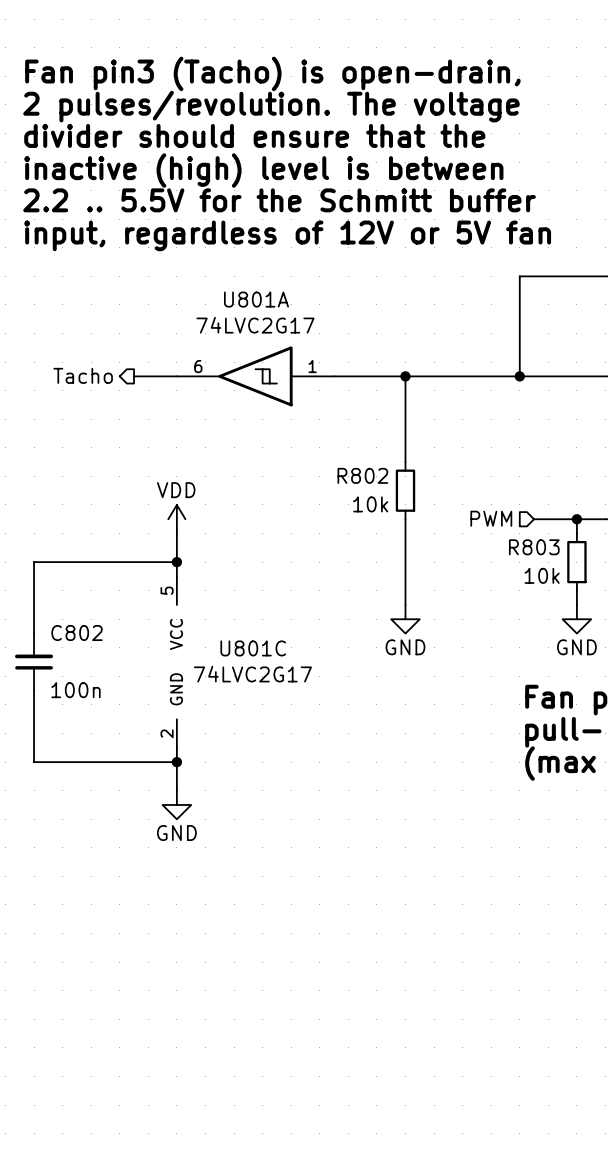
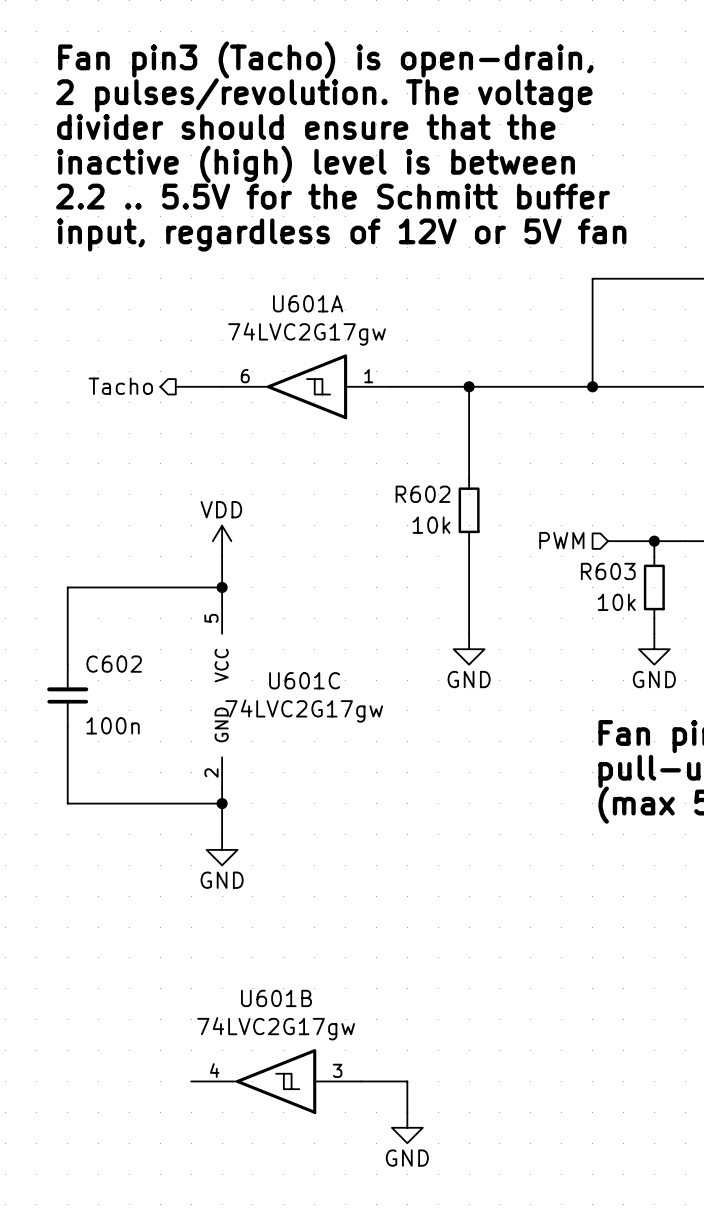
U801A name: U801A (256, 299) -> U601A (308, 303)
U801A value: 74LVC2G17 (255, 325) -> 74LVC2G17gw (307, 334)
R802 name: R802 (362, 475) -> R602 (423, 494)
R803 name: R803 (534, 547) -> R603 (608, 571)
C802 name: C802 (77, 633) -> C602 (114, 664)
U801C name: U801C (253, 648) -> U601C (304, 680)
U801C value: 74LVC2G17 (252, 674) -> 74LVC2G17gw (304, 711)
U601B: none -> 74LVC2G17gw (276, 1081)
wire: none -> (361, 1081) (407, 1081) (407, 1112)
power symbol: none -> GND (407, 1127)

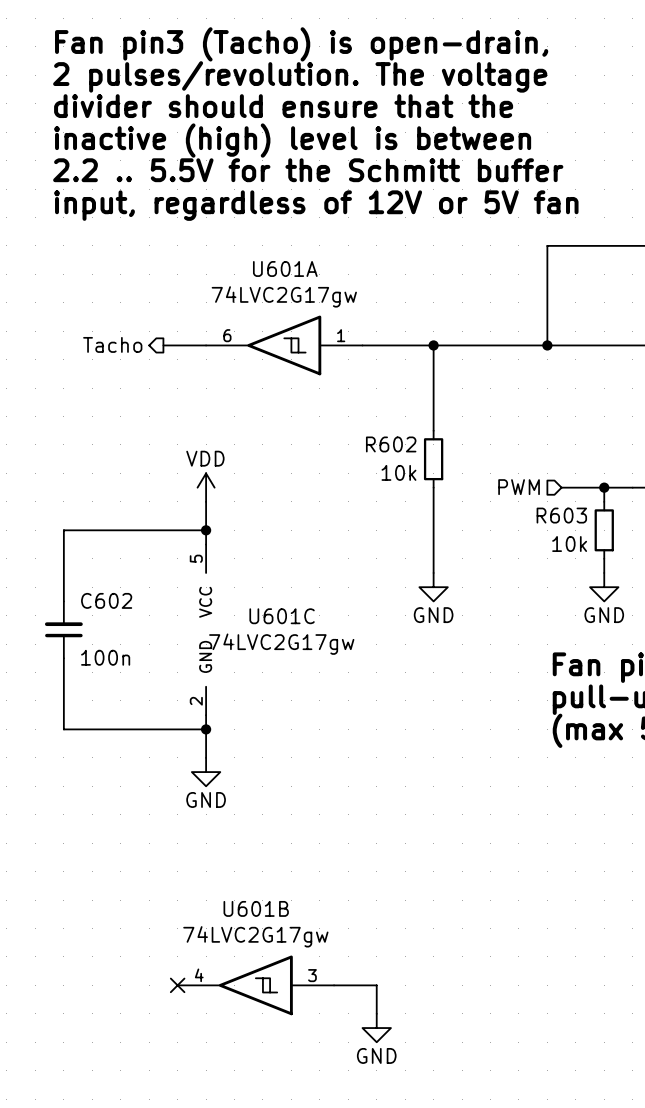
no-connect mark: none -> (177, 985)

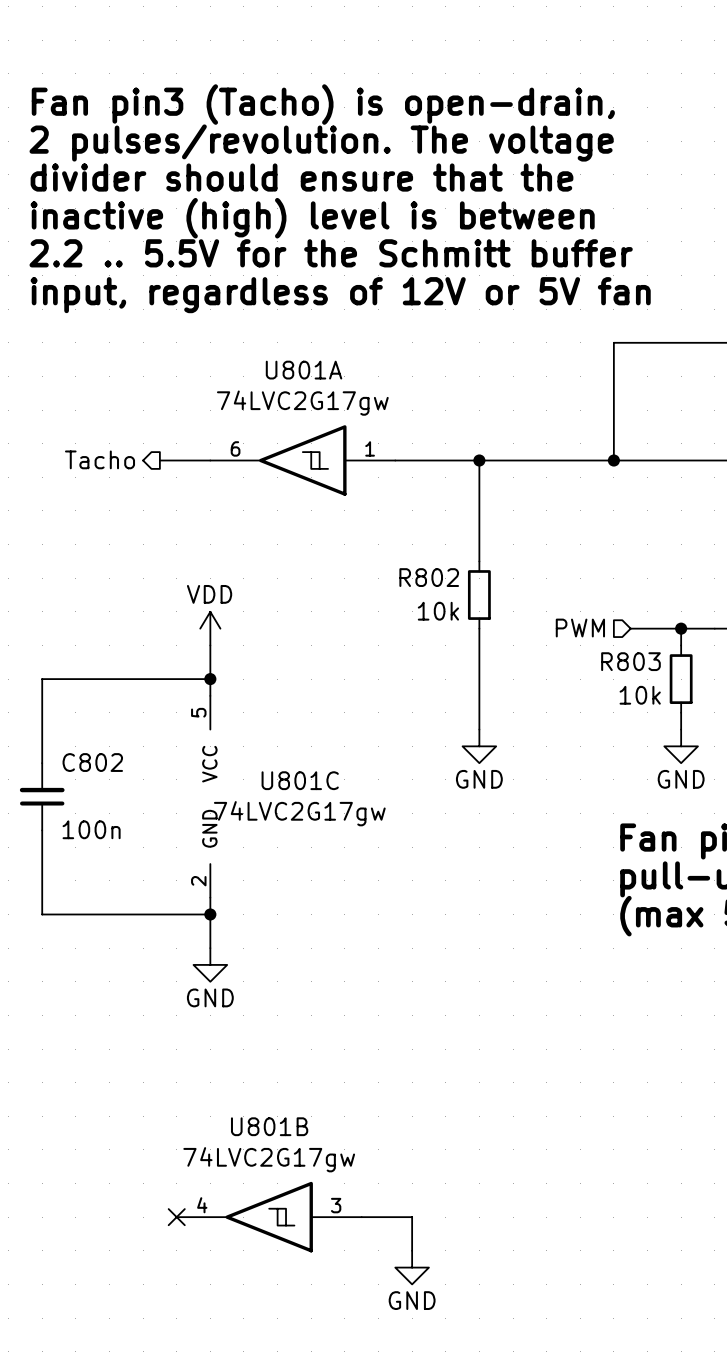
U601A name: U601A (285, 268) -> U801A (304, 370)
R602 name: R602 (391, 444) -> R802 (429, 577)
R603 name: R603 (561, 515) -> R803 (630, 661)
C602 name: C602 (106, 600) -> C802 (92, 762)
U601C name: U601C (282, 616) -> U801C (300, 780)
U601B name: U601B (256, 908) -> U801B (269, 1126)

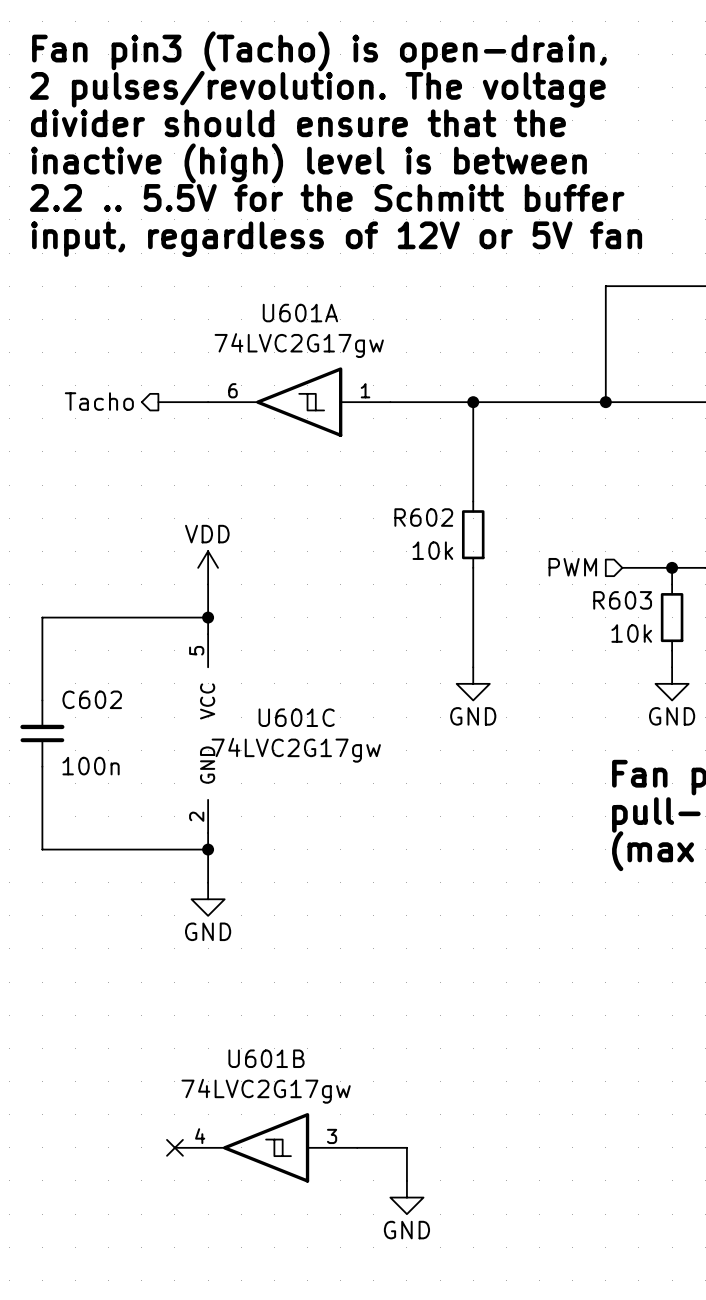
U801A name: U801A (304, 370) -> U601A (300, 313)
R802 name: R802 (429, 577) -> R602 (423, 517)
R803 name: R803 (630, 661) -> R603 (622, 600)
C802 name: C802 (92, 762) -> C602 (92, 699)
U801C name: U801C (300, 780) -> U601C (296, 717)
U801B name: U801B (269, 1126) -> U601B (266, 1058)

